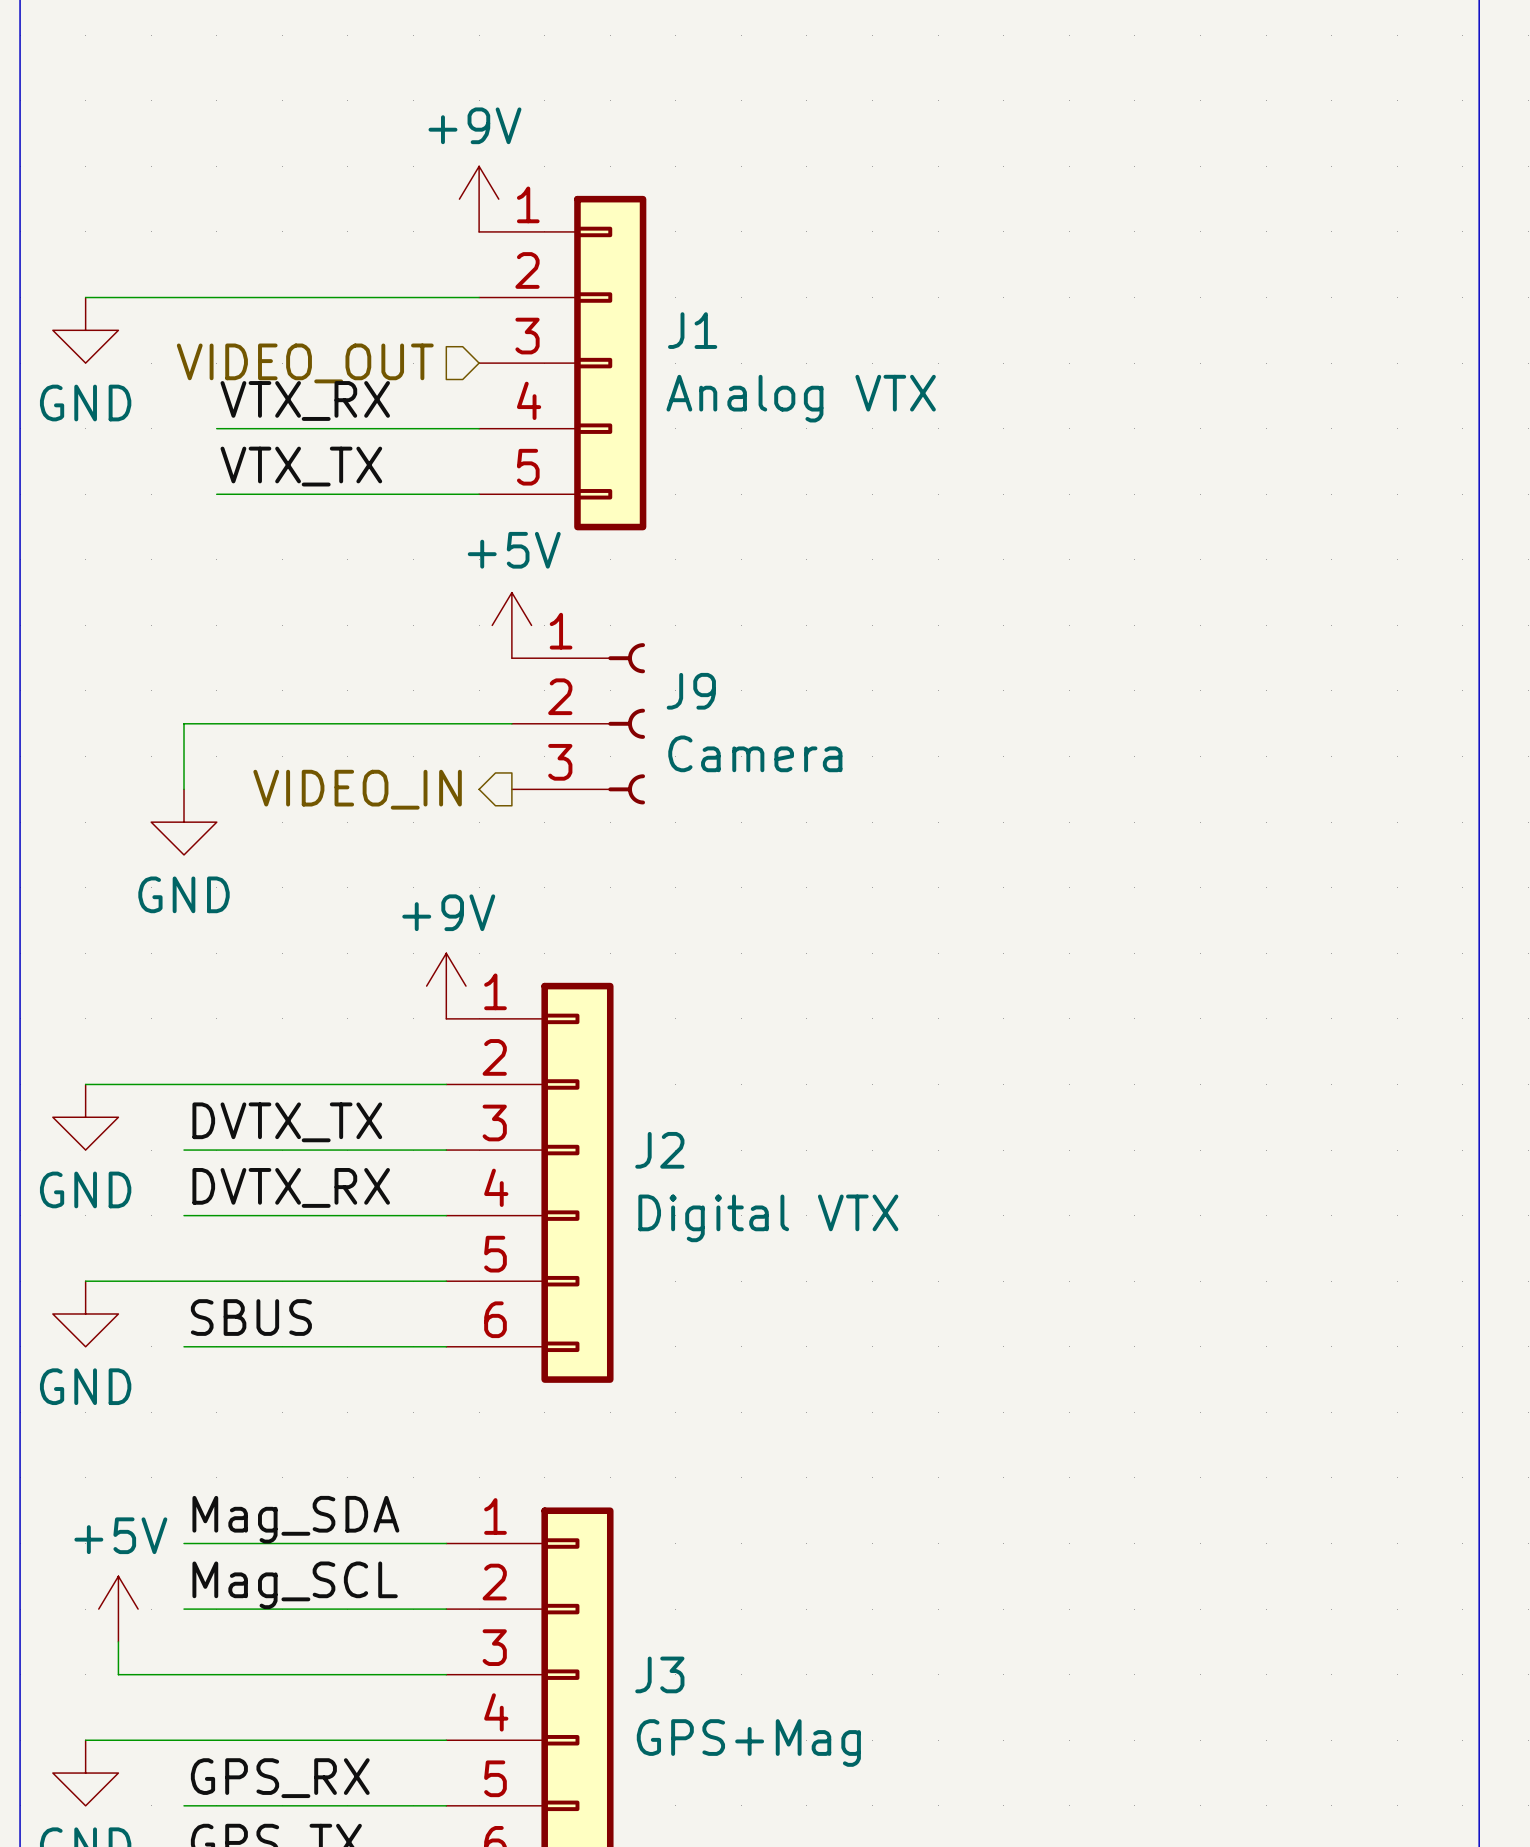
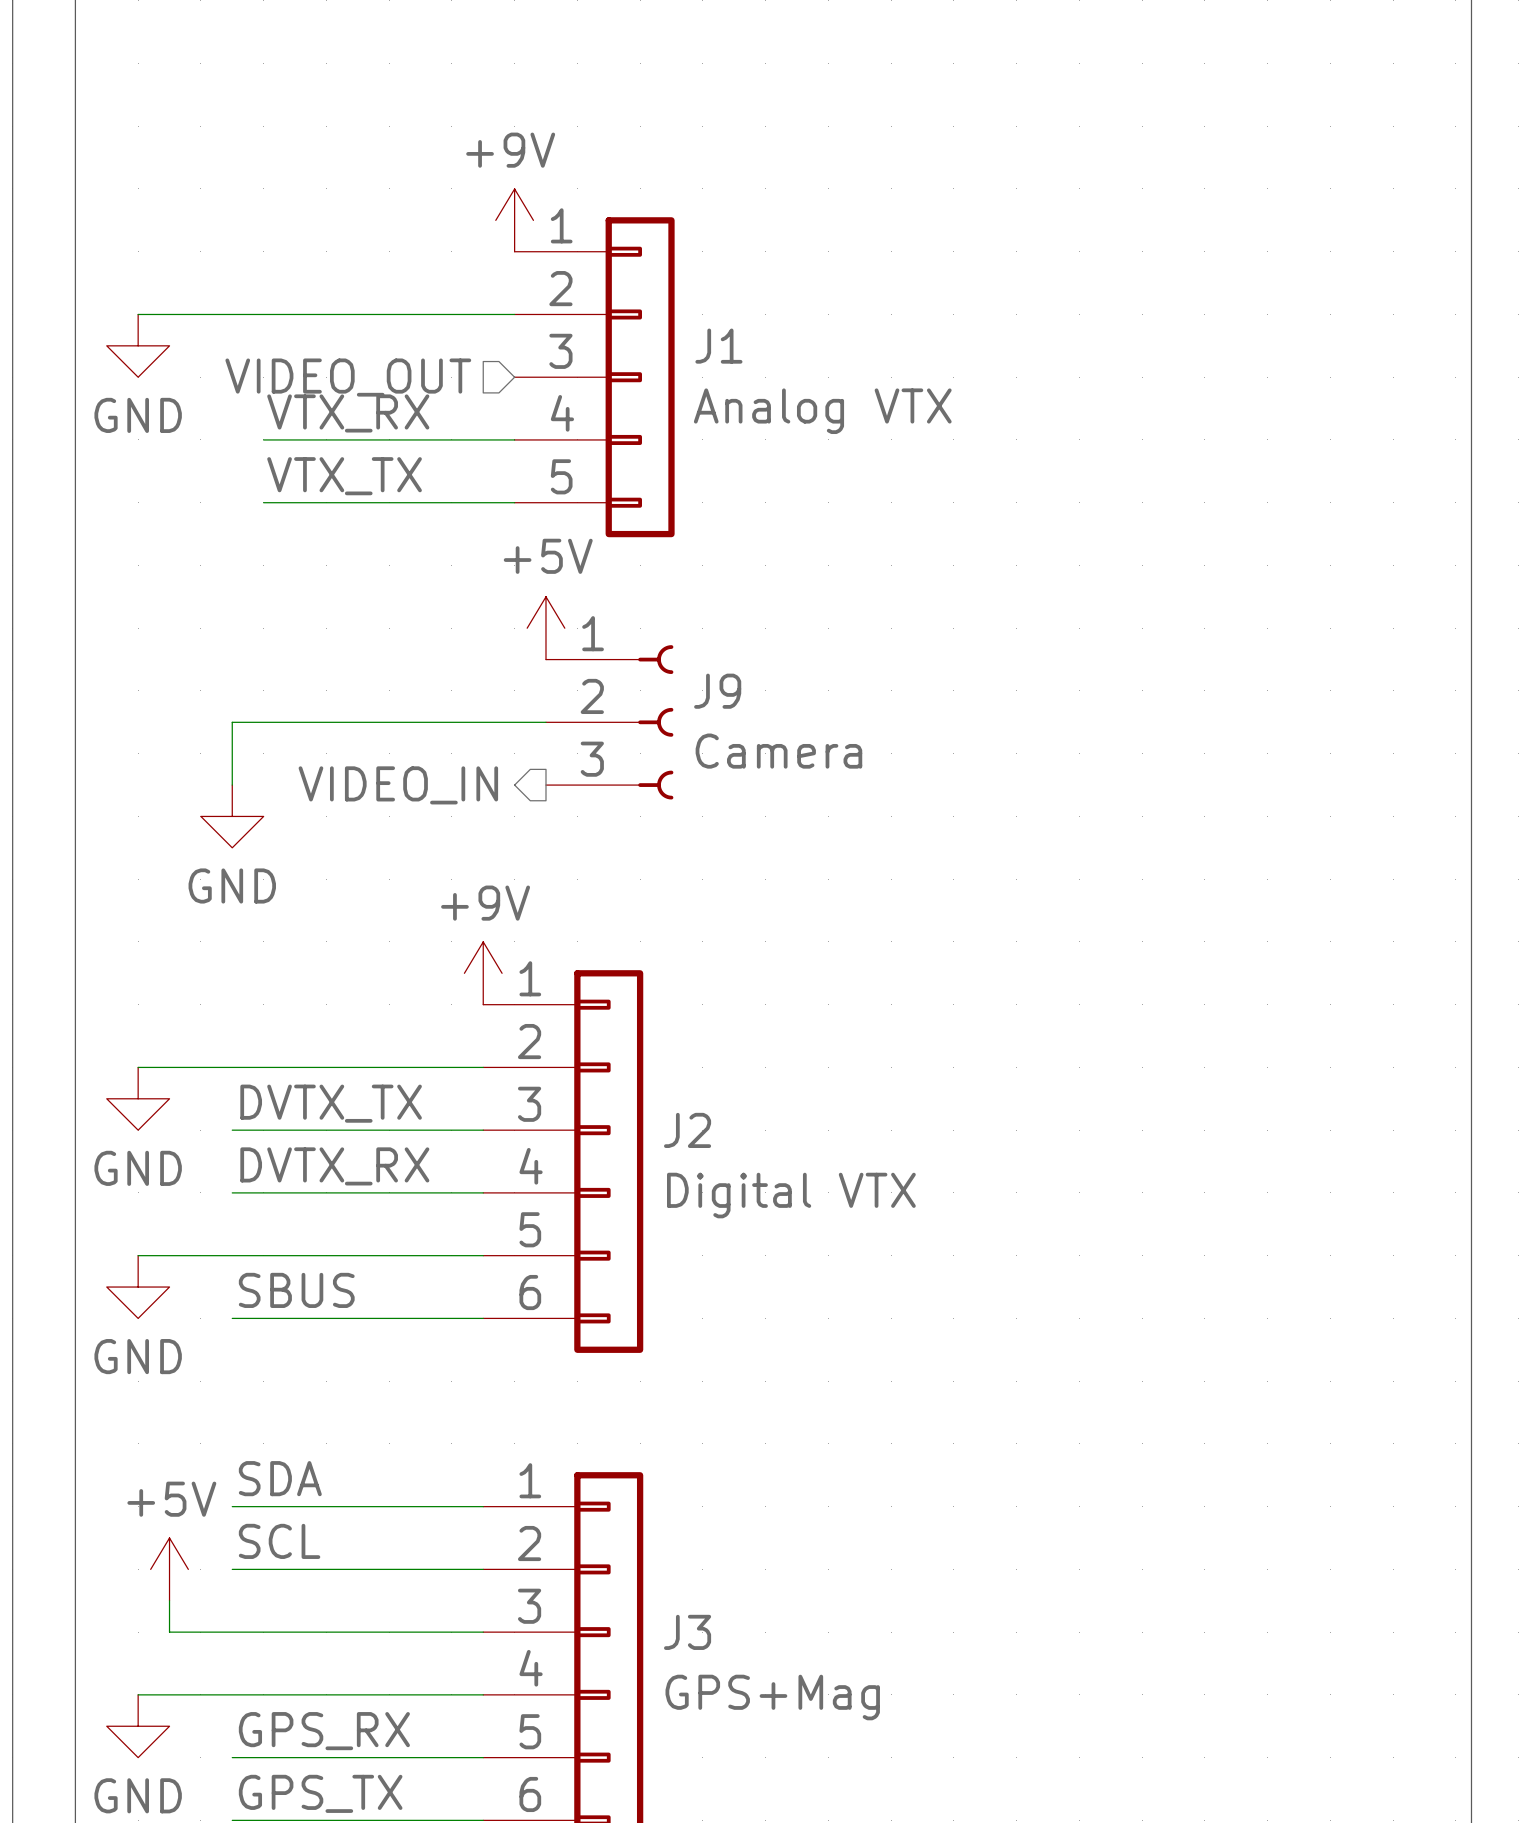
label: Mag_SDA (295, 1519) -> SDA (280, 1478)
label: Mag_SCL (295, 1585) -> SCL (279, 1541)

